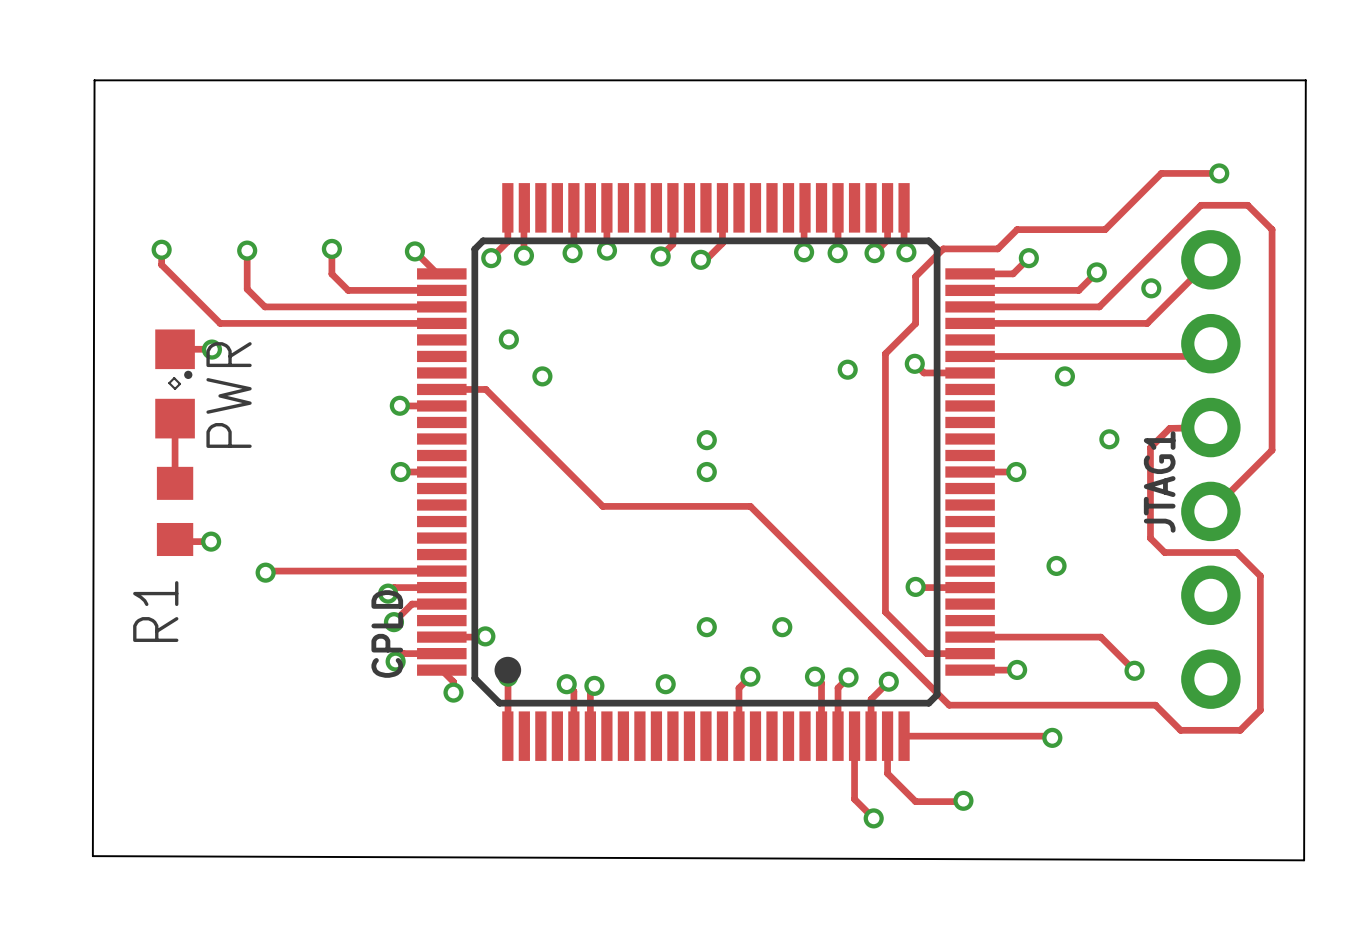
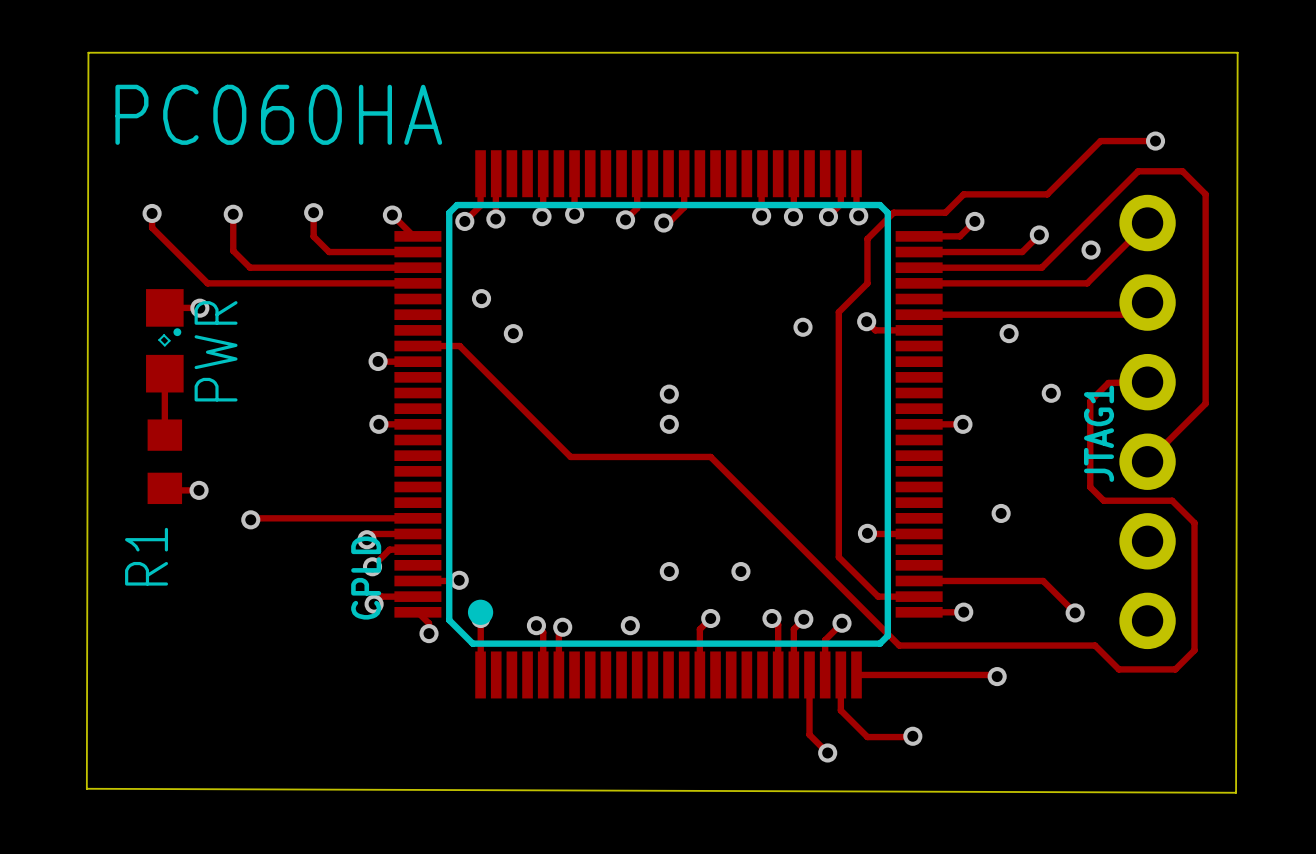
text: none -> PC060HA (278, 114)

